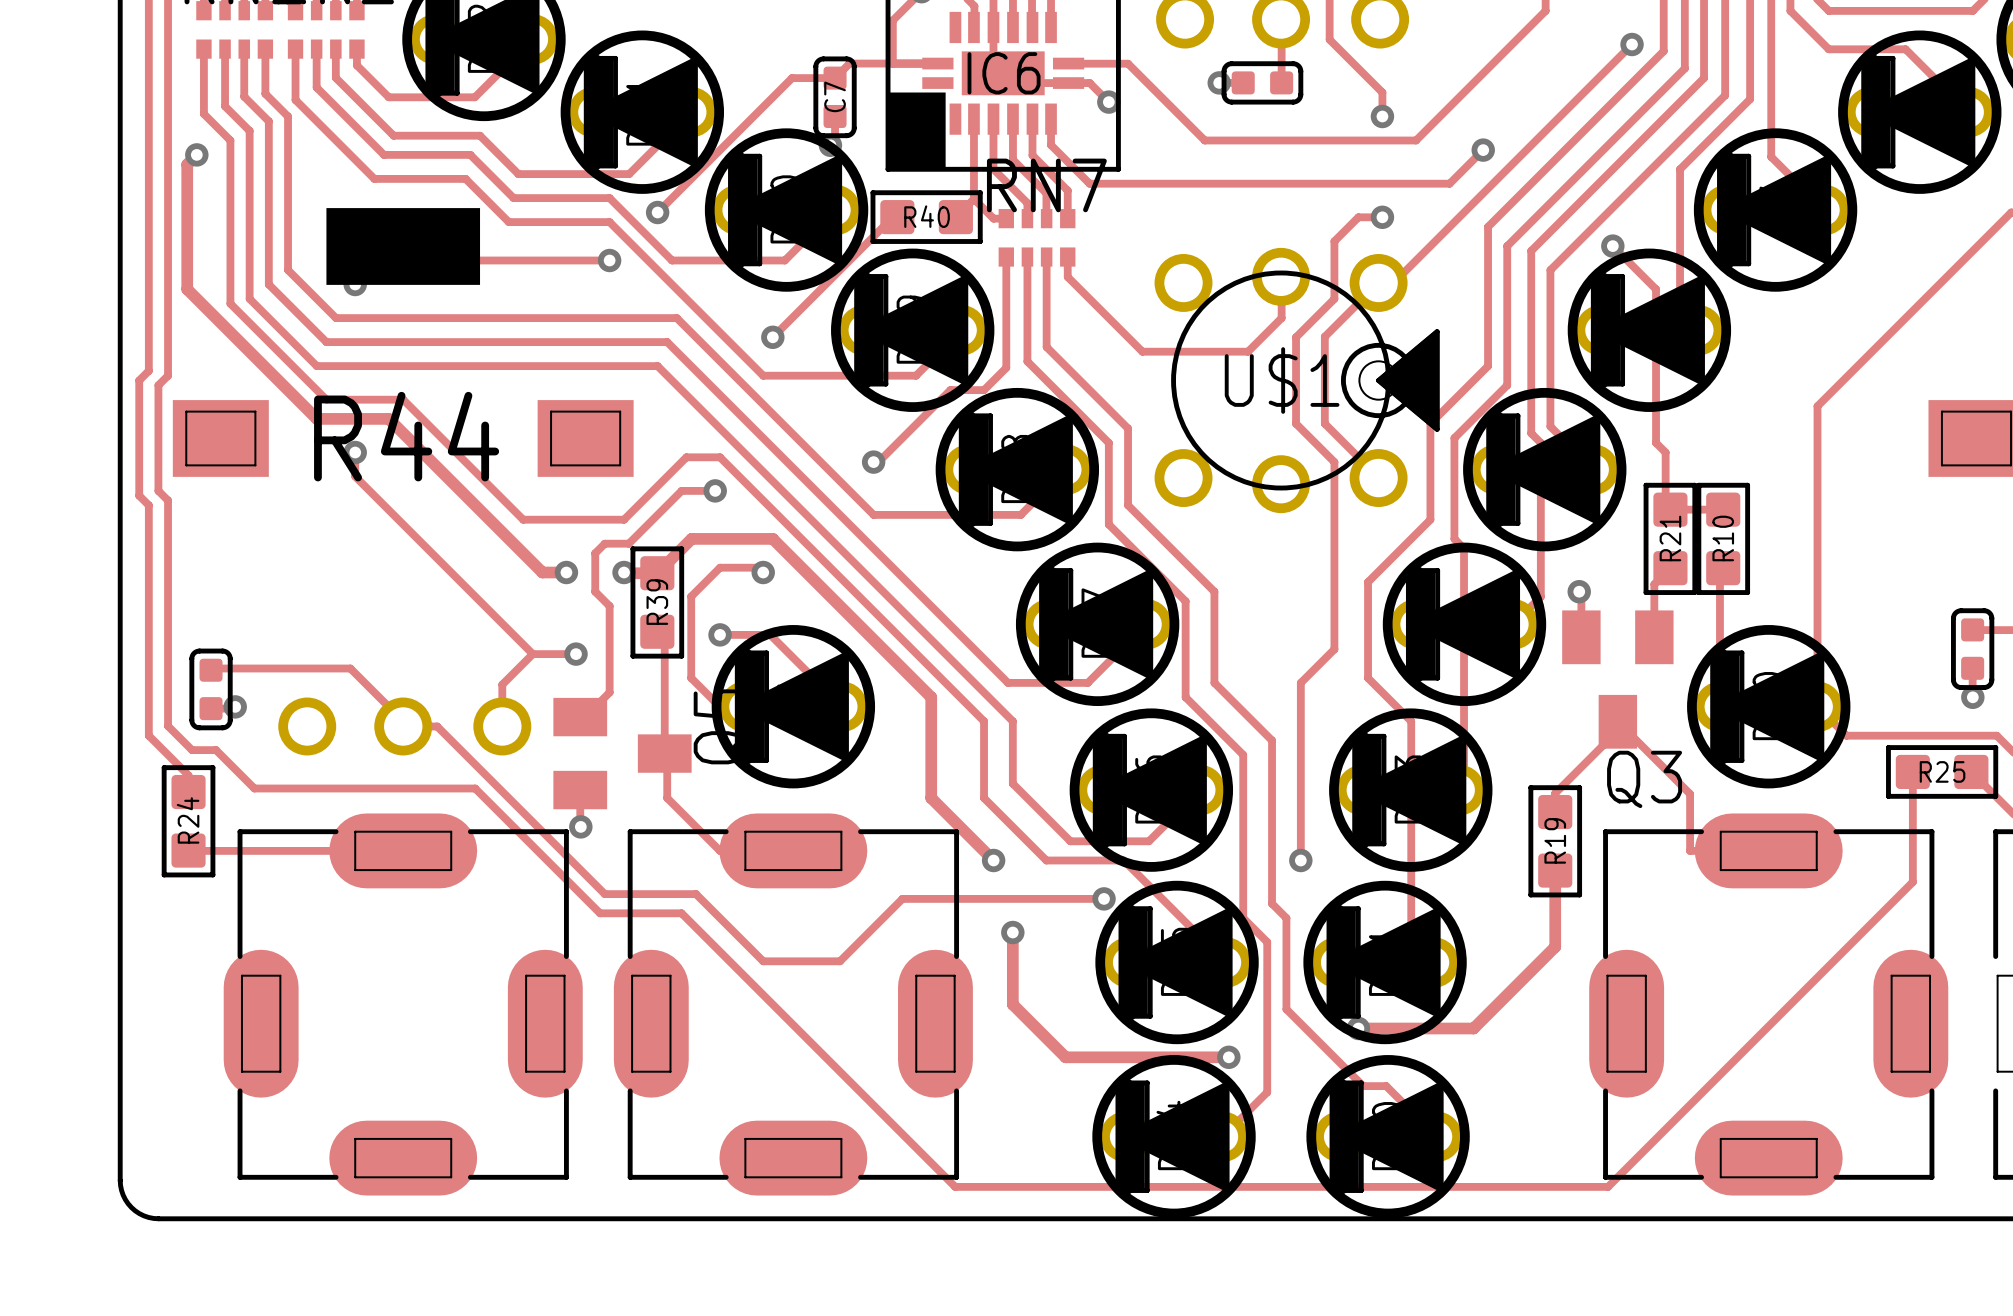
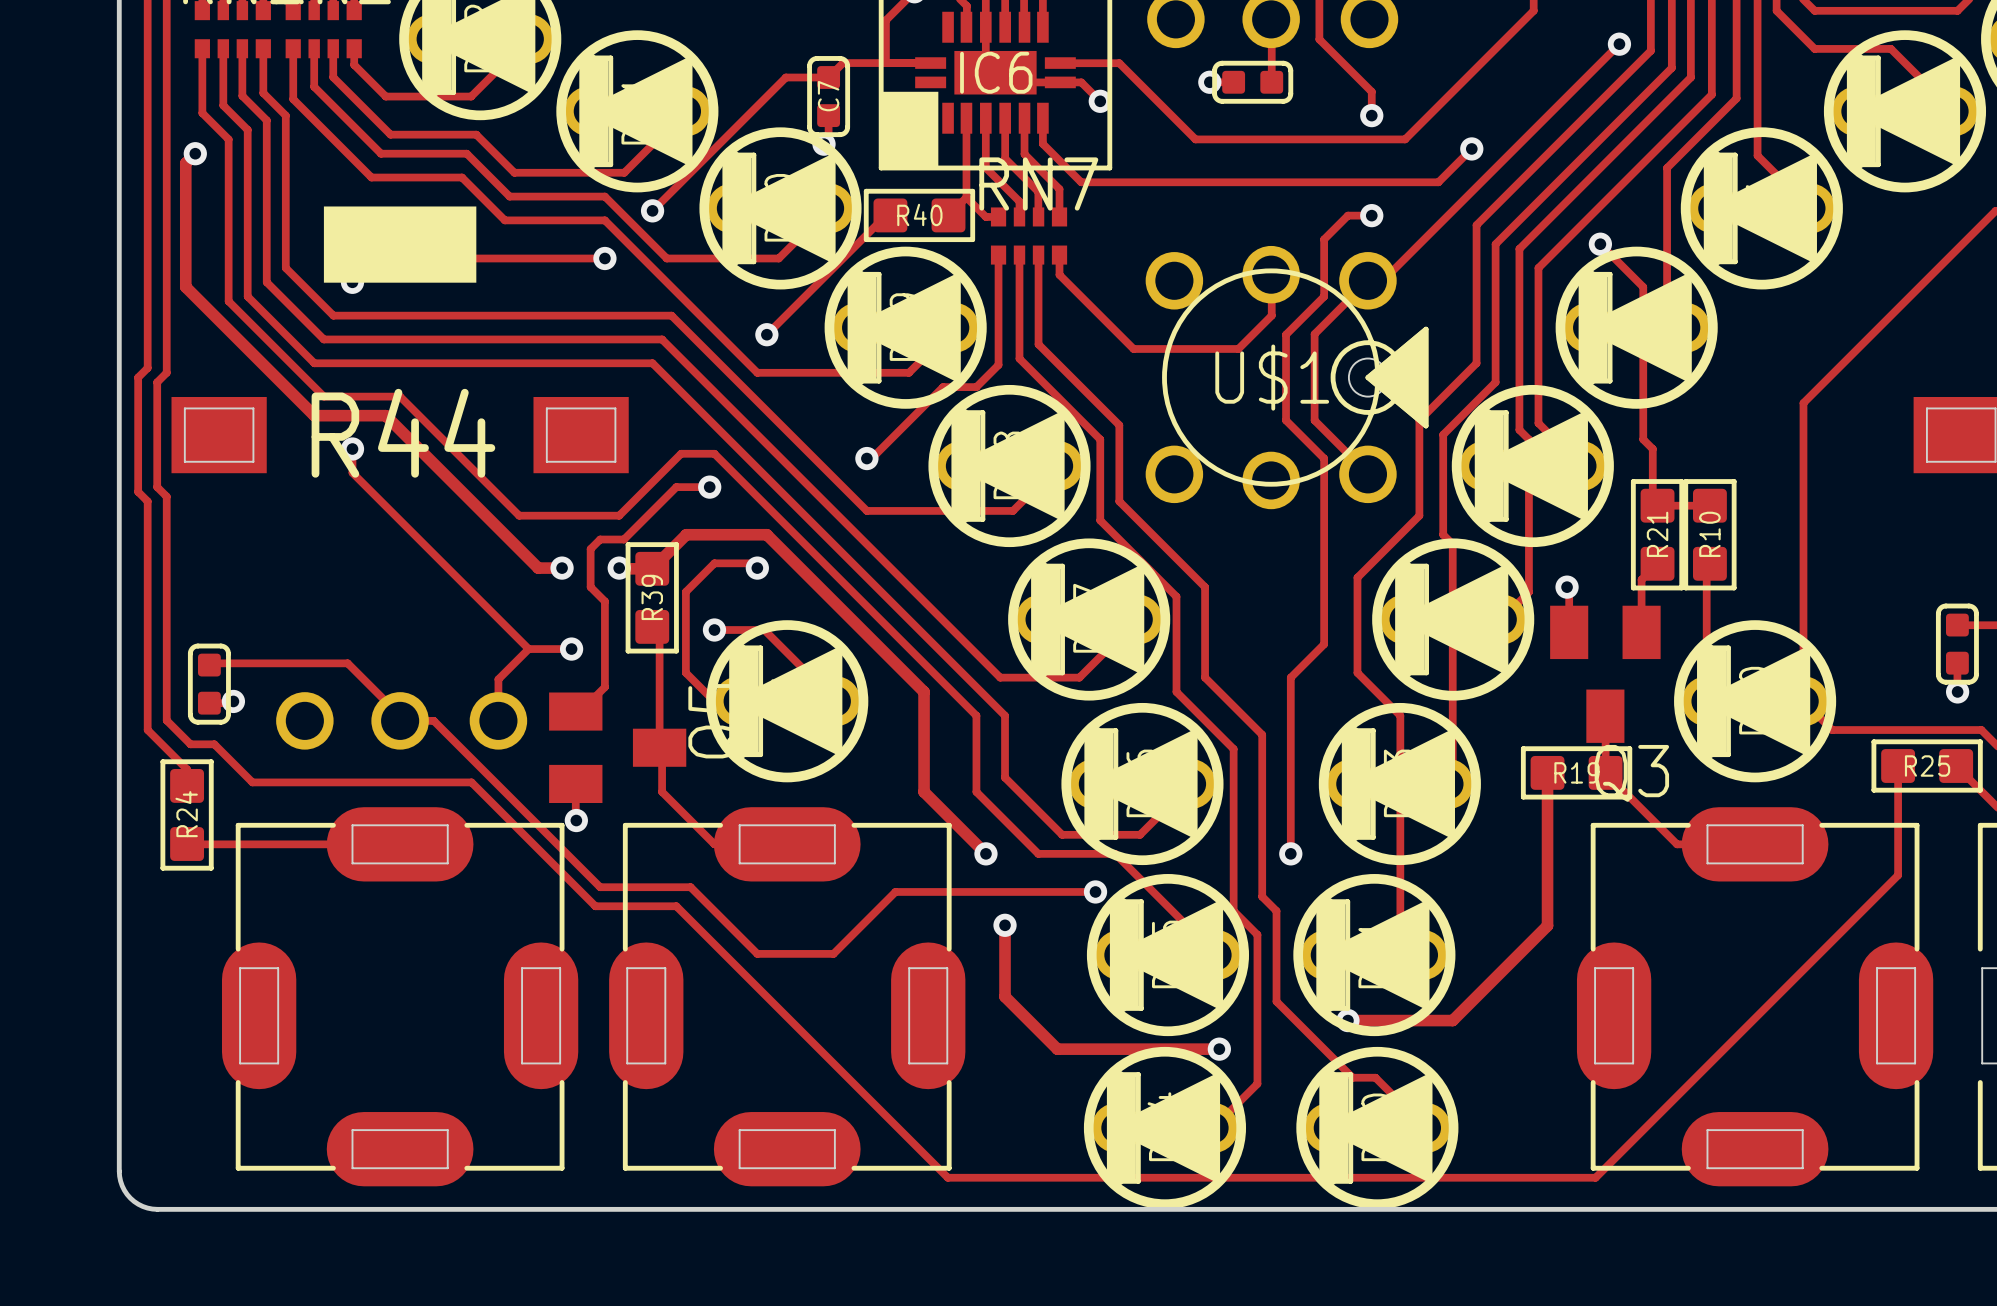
track: (1617, 721) (1603, 736) (1603, 745) (1555, 793) (1555, 812) -> none
track: (1618, 722) (1690, 794) (1690, 850) -> (1605, 716) (1605, 772) (1677, 844)
R19 rotation: 0° (1555, 841) -> 90° clockwise (1576, 772)
R19 position: (1555, 841) -> (1576, 772)
track: (1555, 870) (1555, 946) (1473, 1028) (1464, 1028) -> (1547, 772) (1547, 925) (1452, 1020)

